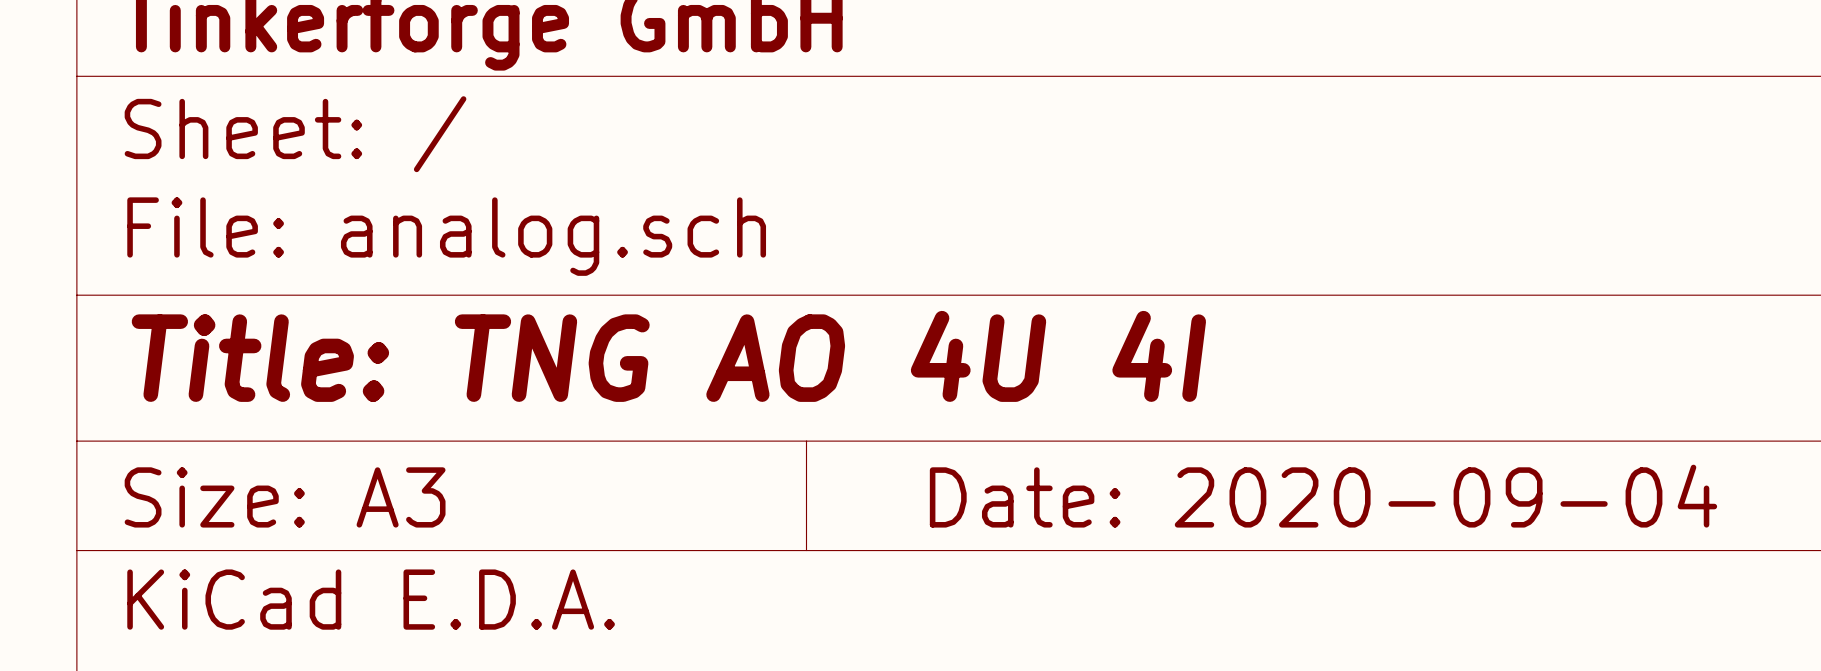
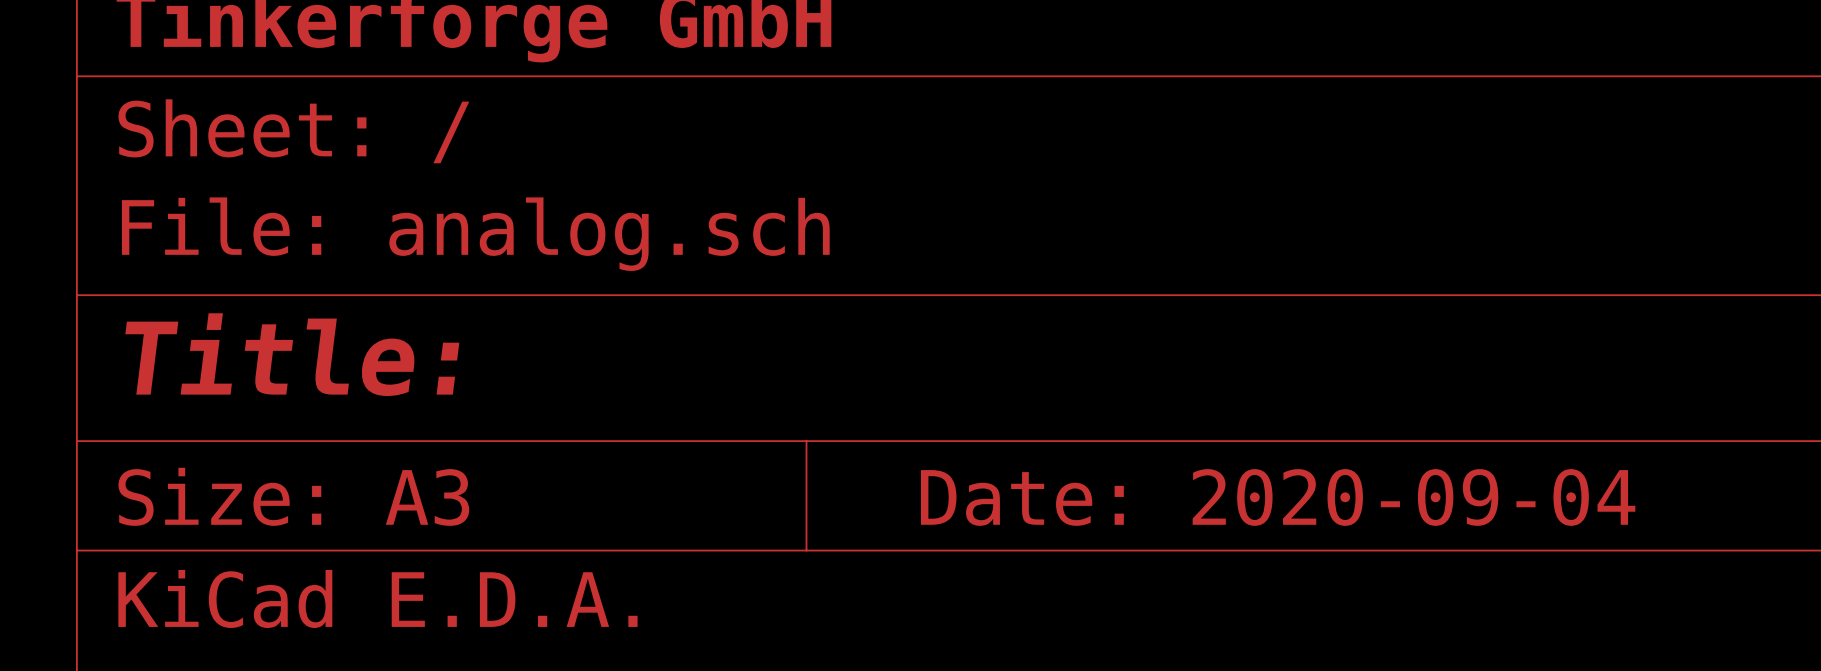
title block: Title: TNG AO 4U 4I (668, 356) -> Title: (292, 354)

